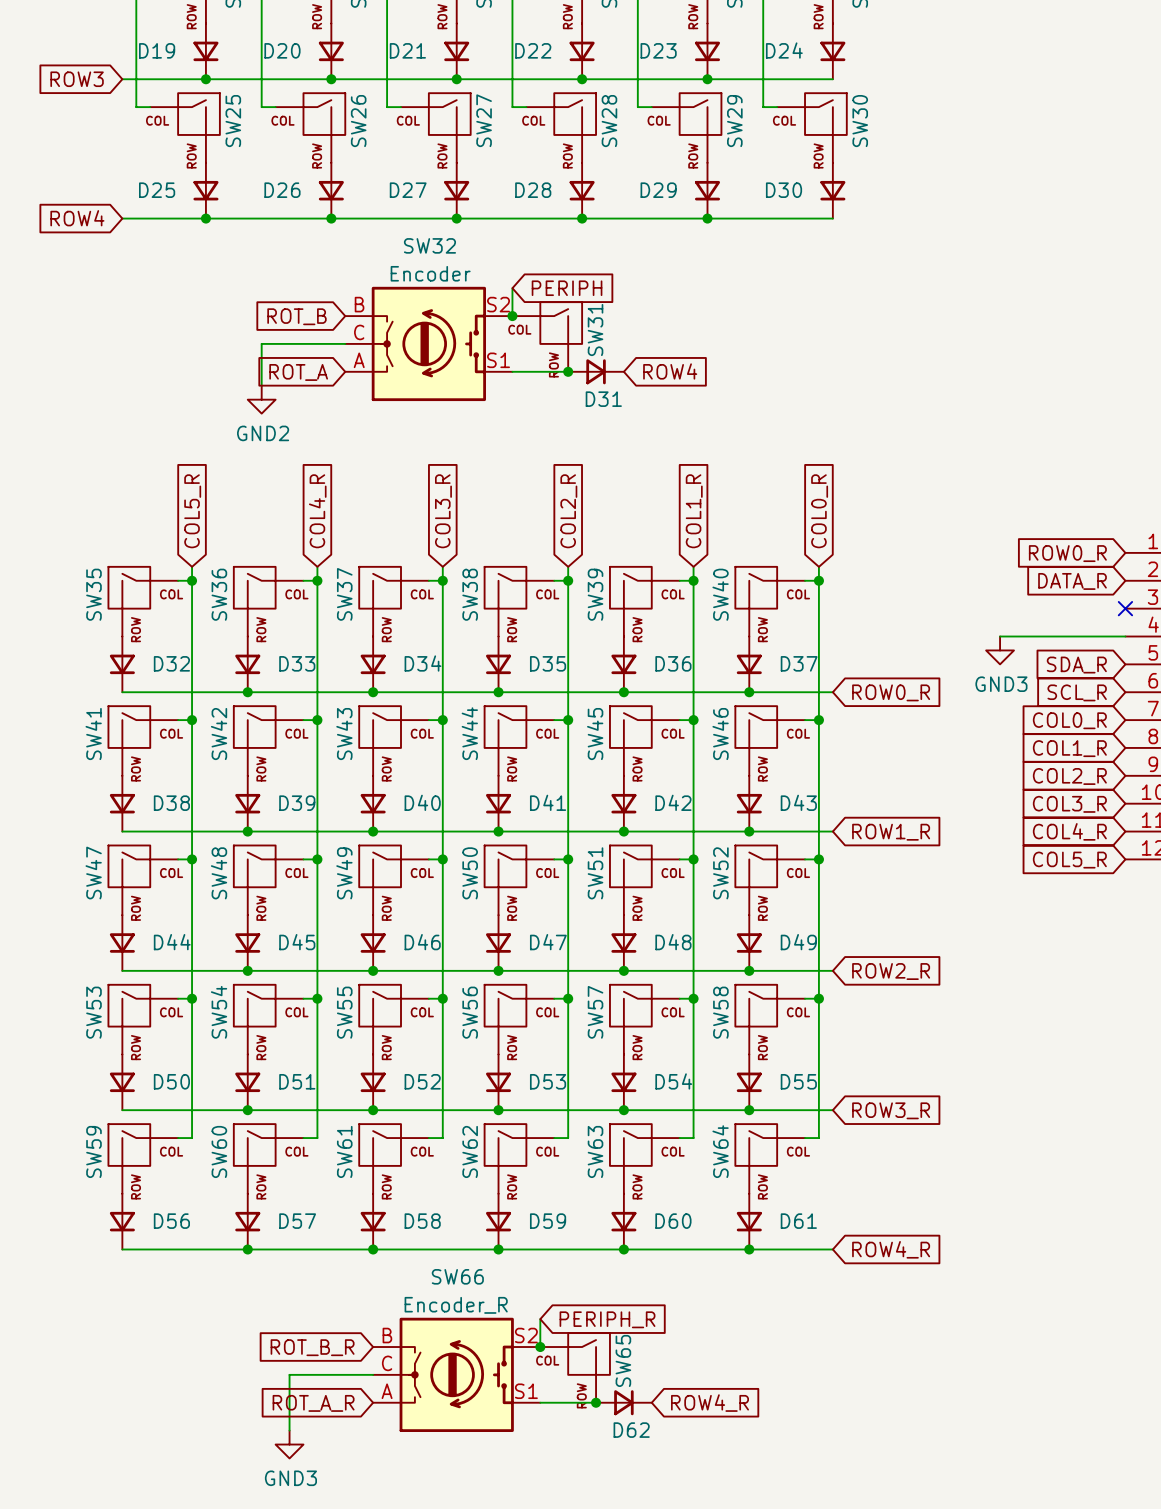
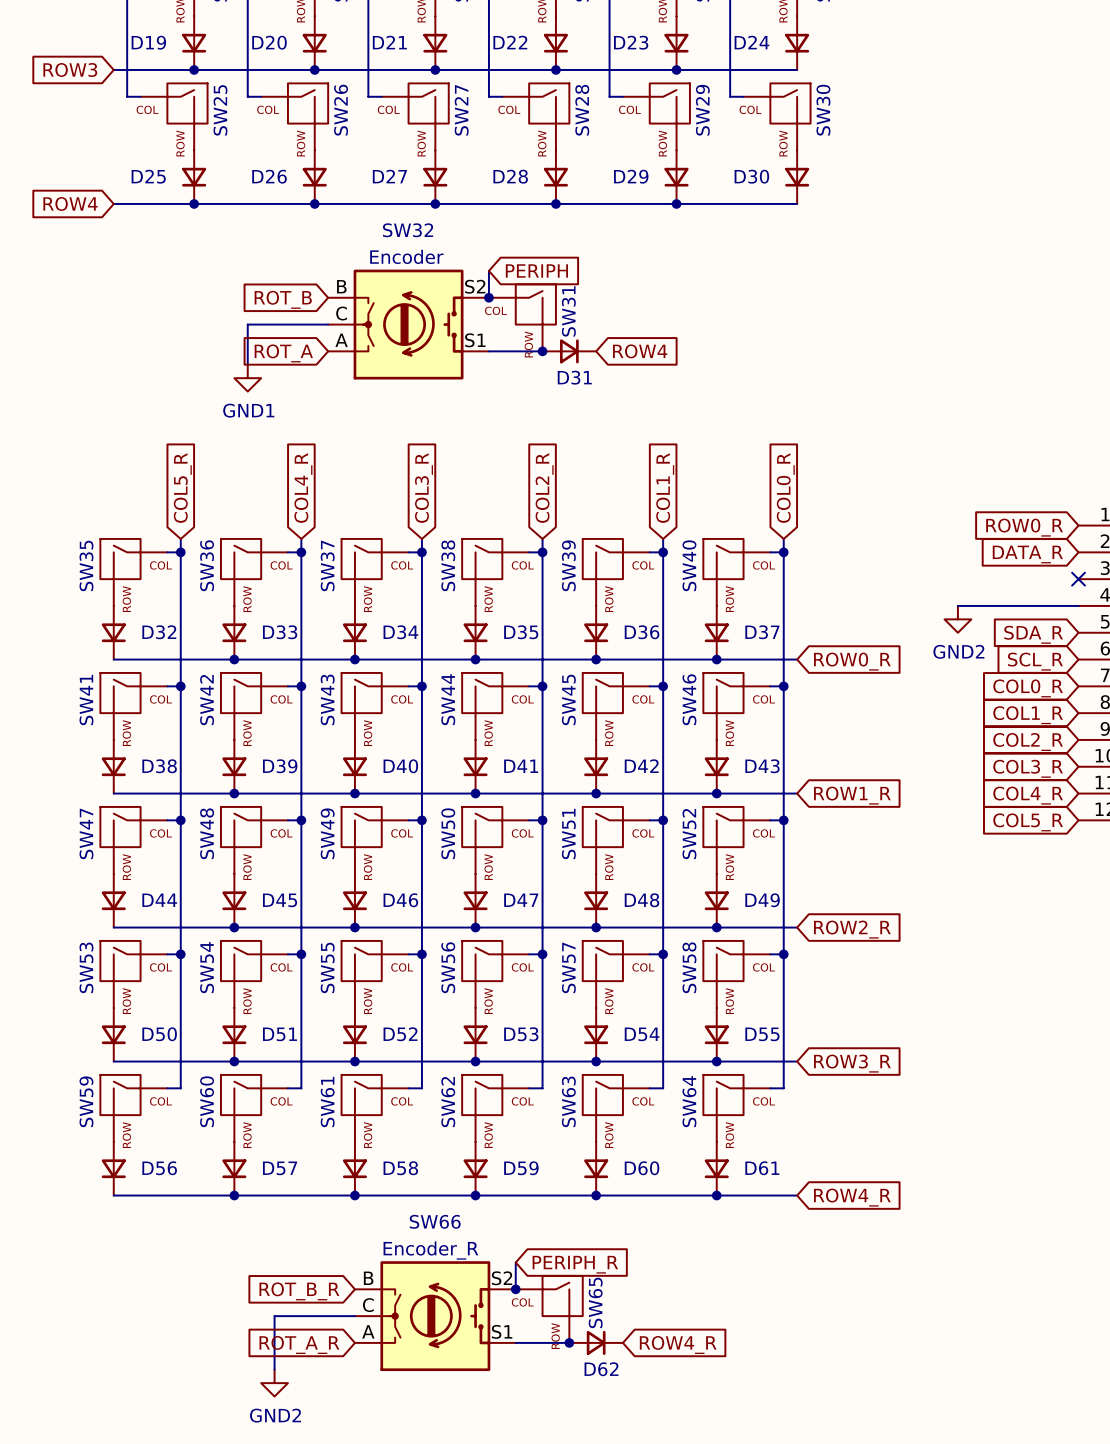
power symbol: GND2 (261, 399) -> GND1 (247, 378)
power symbol: GND3 (1000, 650) -> GND2 (957, 619)
power symbol: GND3 (289, 1444) -> GND2 (274, 1383)

